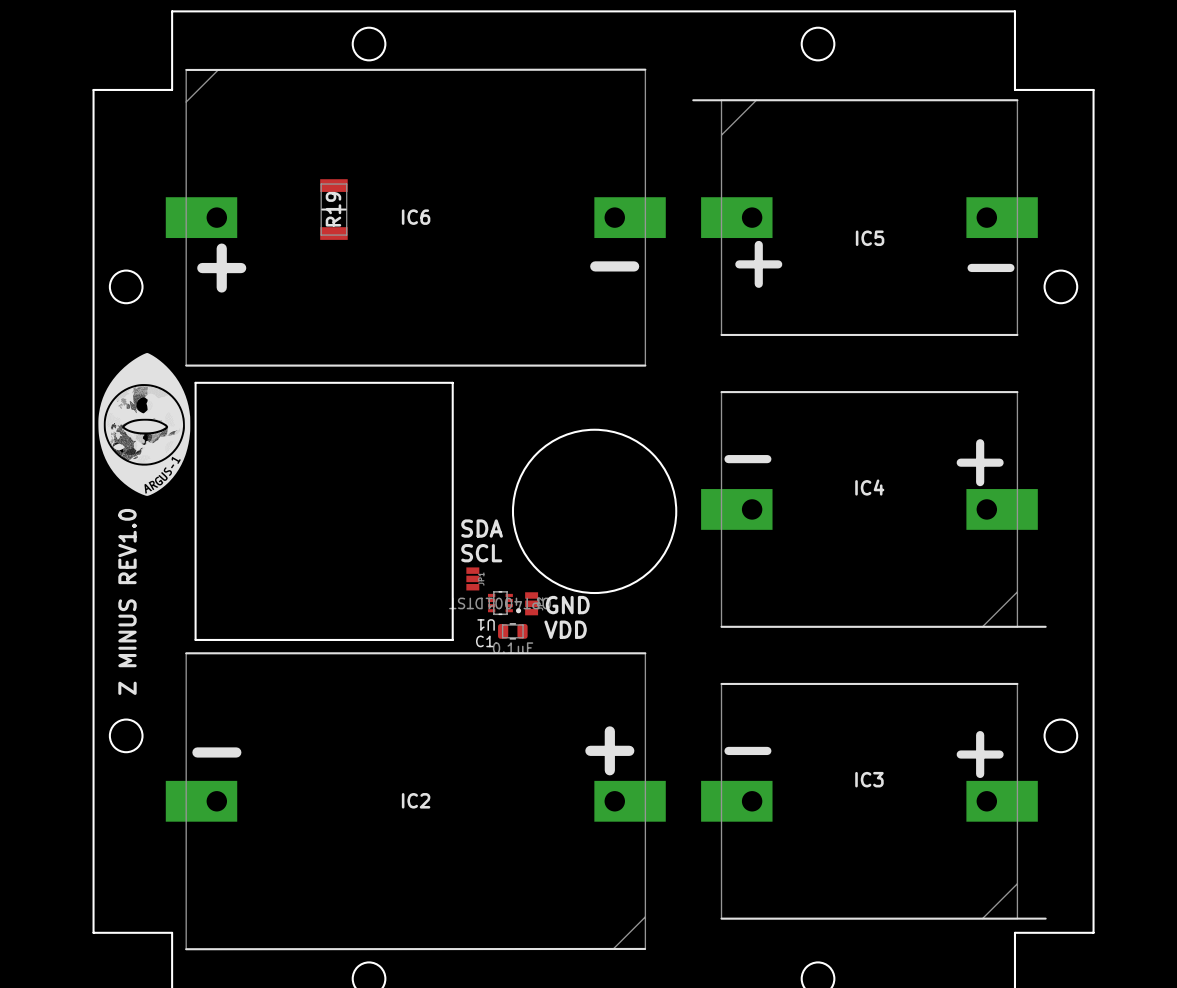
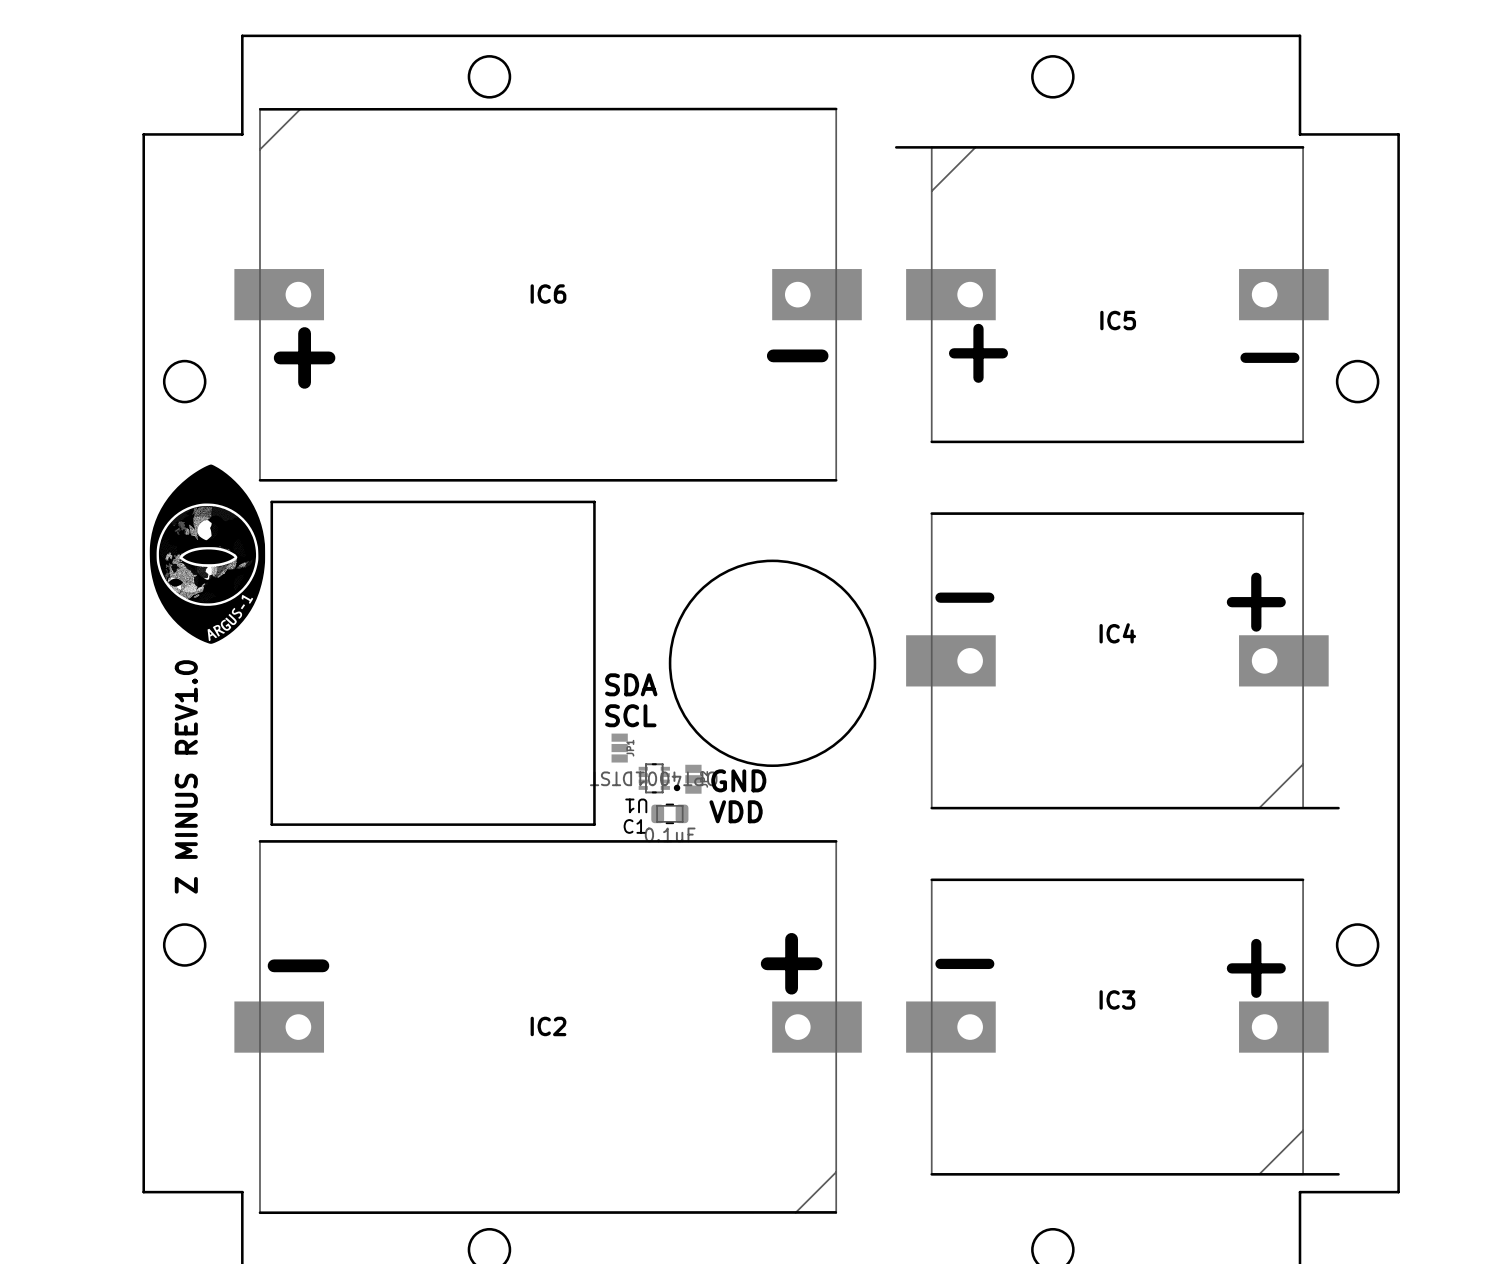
R19: (333, 209) -> none

